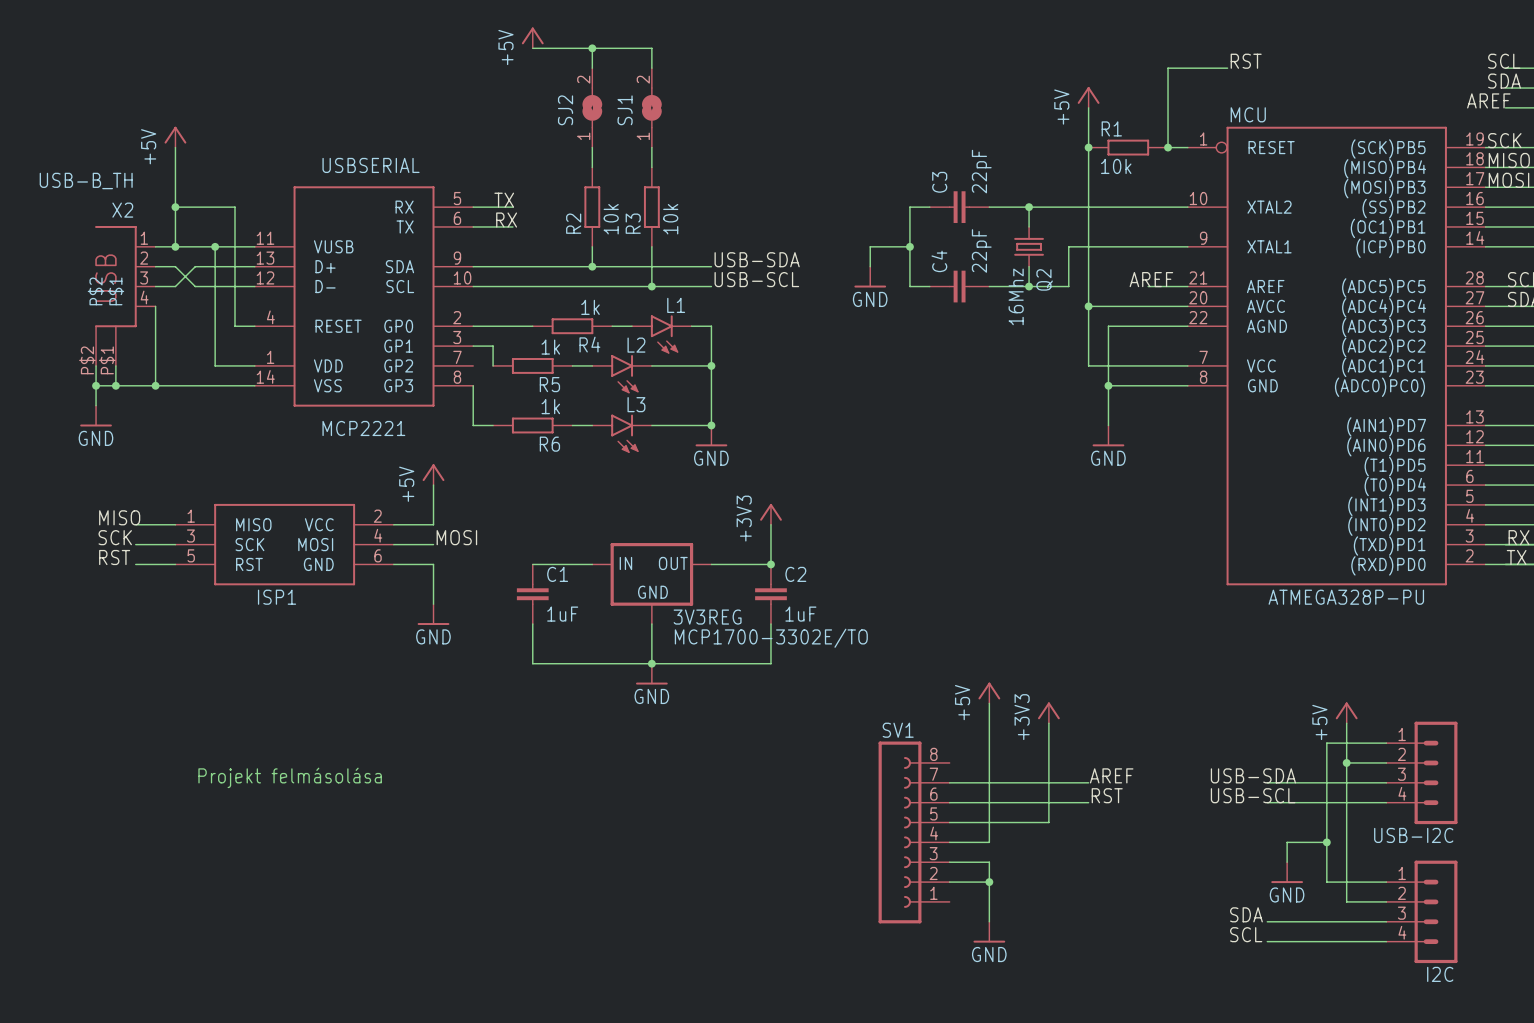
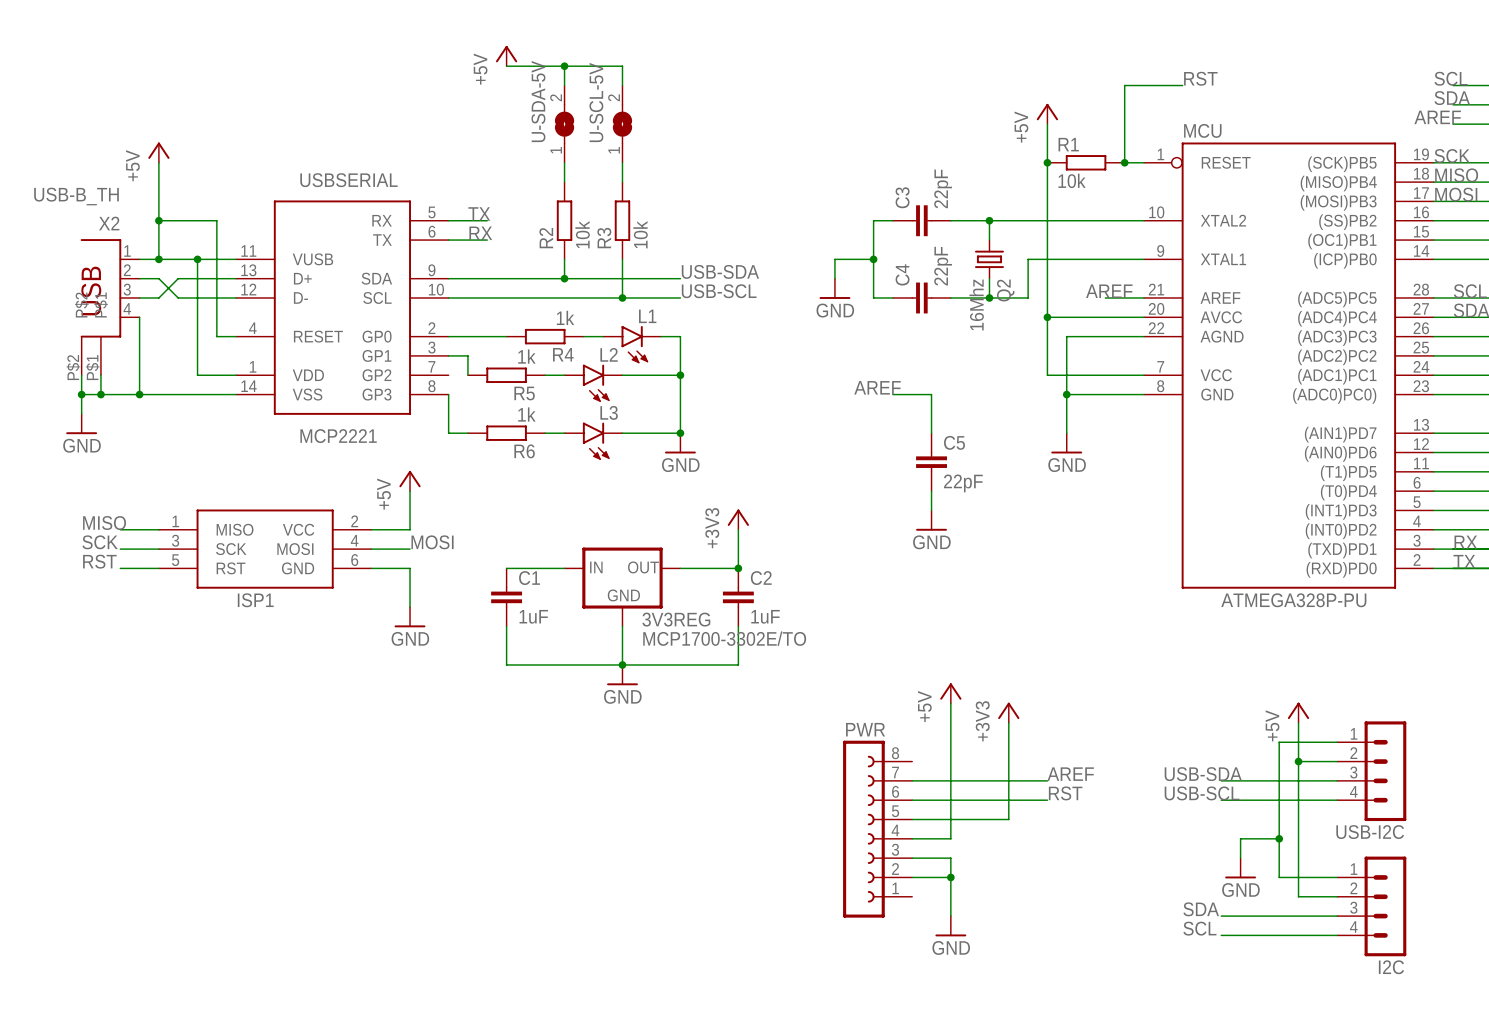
SJ2 name: SJ2 (565, 110) -> U-SDA-5V (538, 101)
SJ1 name: SJ1 (625, 110) -> U-SCL-5V (596, 102)
label: none -> AREF (877, 387)
wire: none -> (892, 394) (931, 394) (931, 433)
C5: none -> 22pF (931, 462)
wire: none -> (931, 491) (931, 510)
power symbol: none -> GND (931, 520)
SV1 name: SV1 (898, 730) -> PWR (865, 729)
text: Projekt felmásolása (290, 777) -> none

